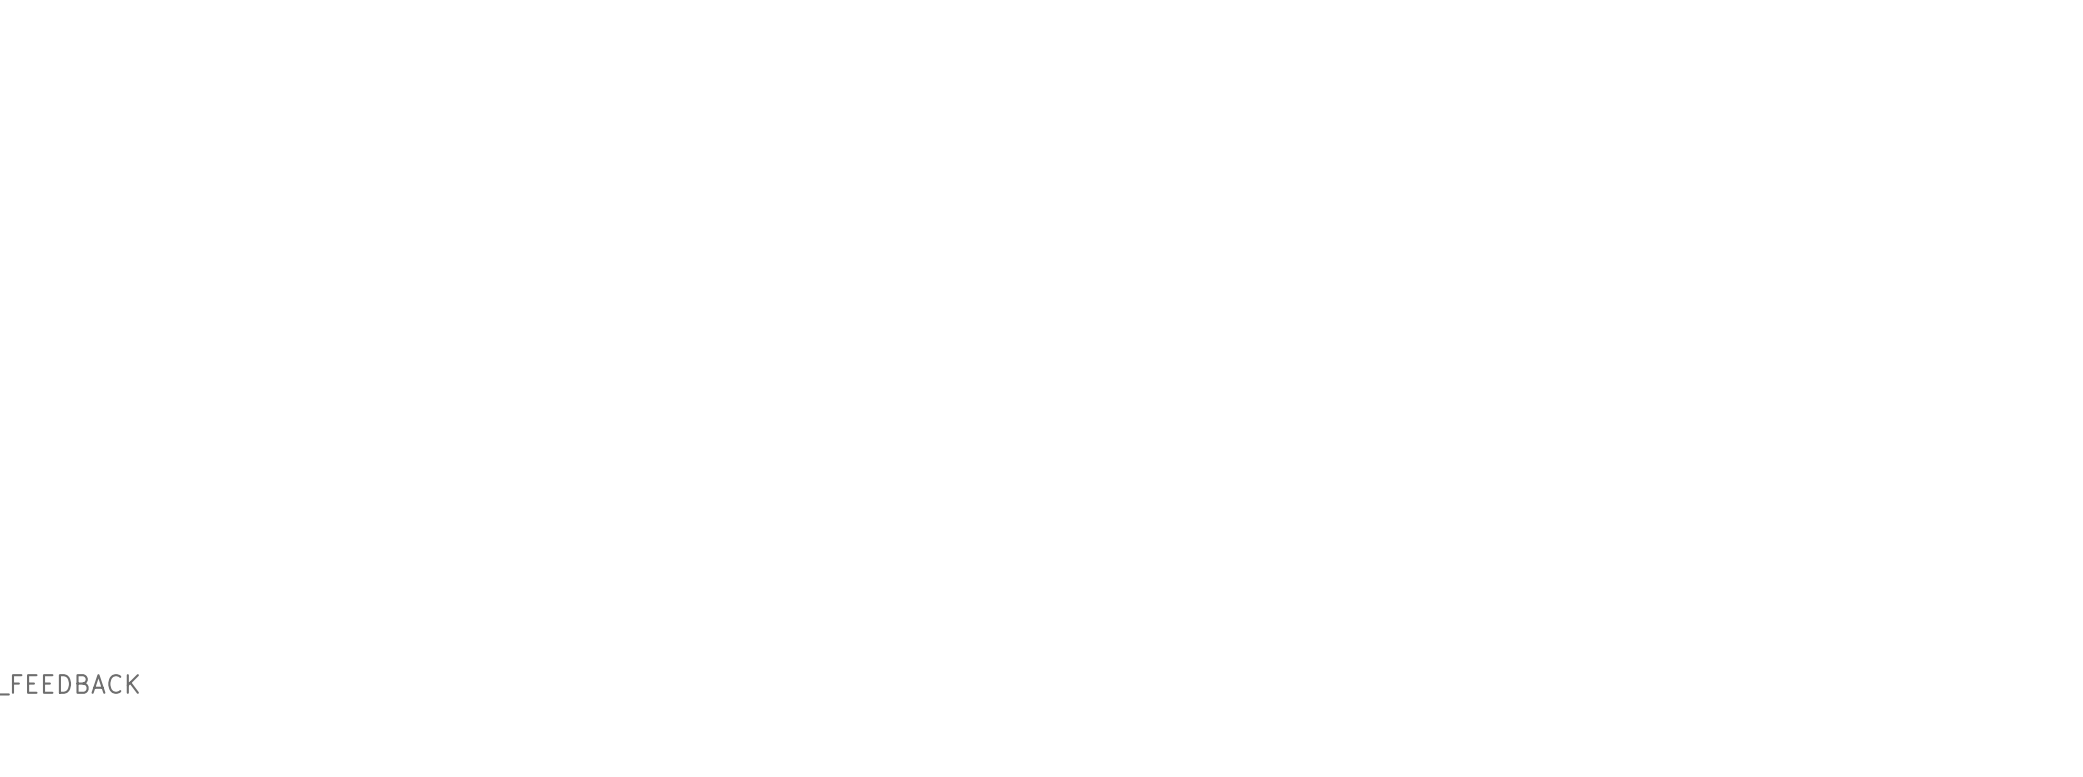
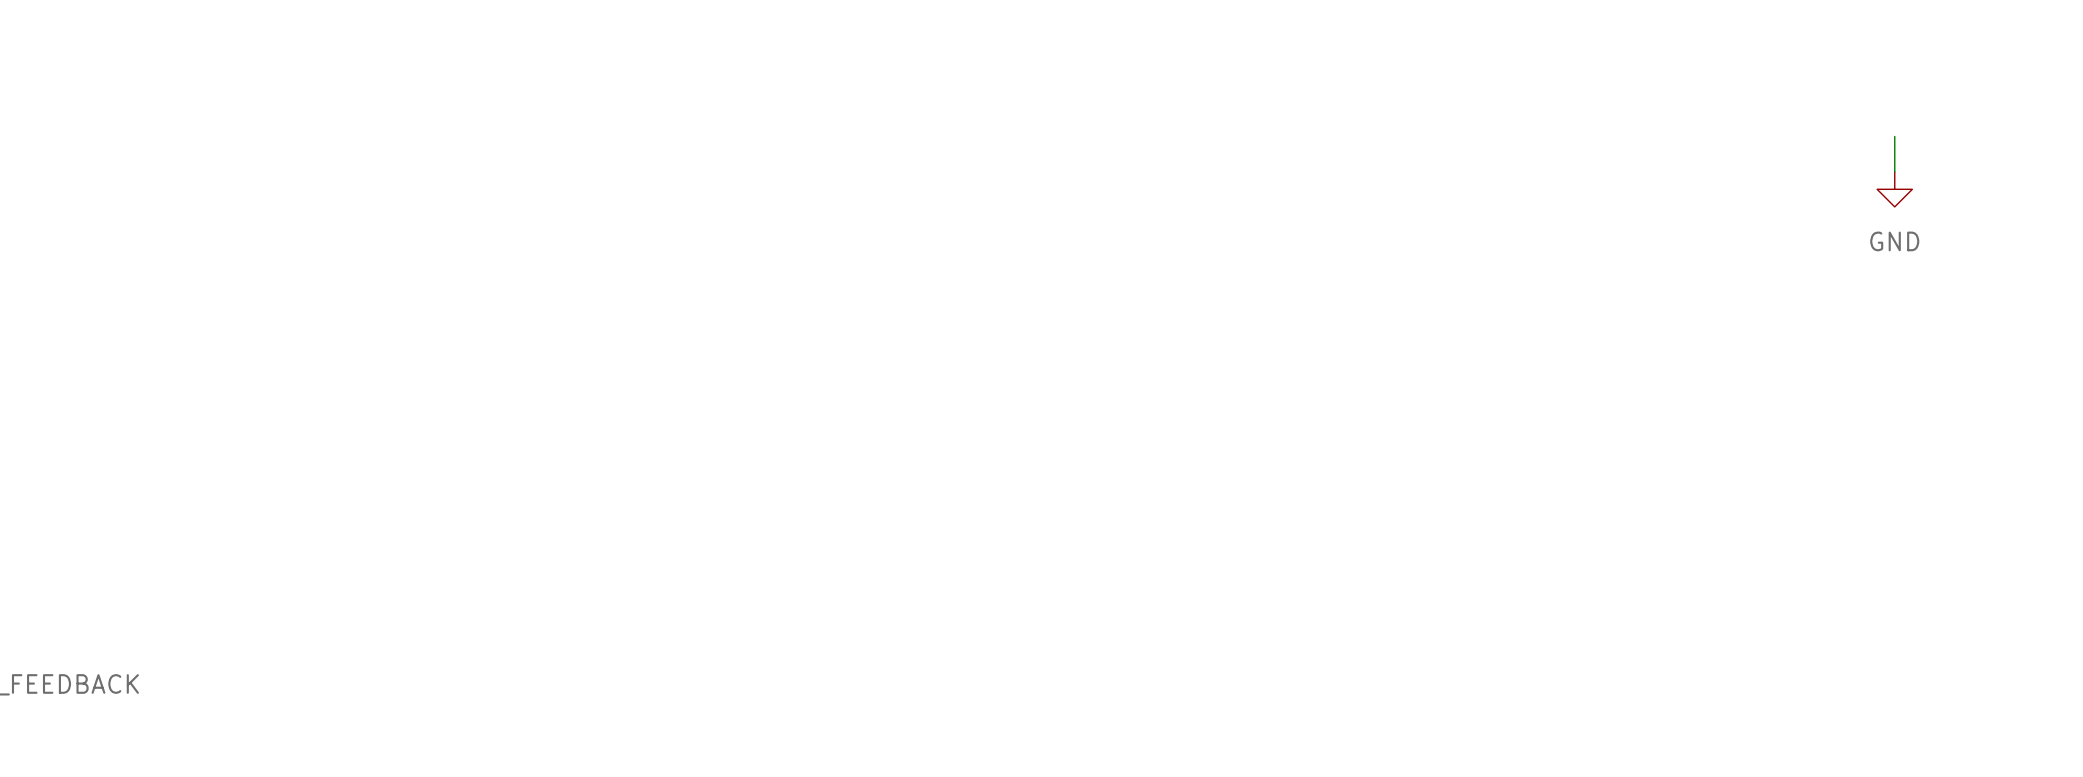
wire: none -> (1894, 136) (1894, 171)
power symbol: none -> GND (1894, 189)

